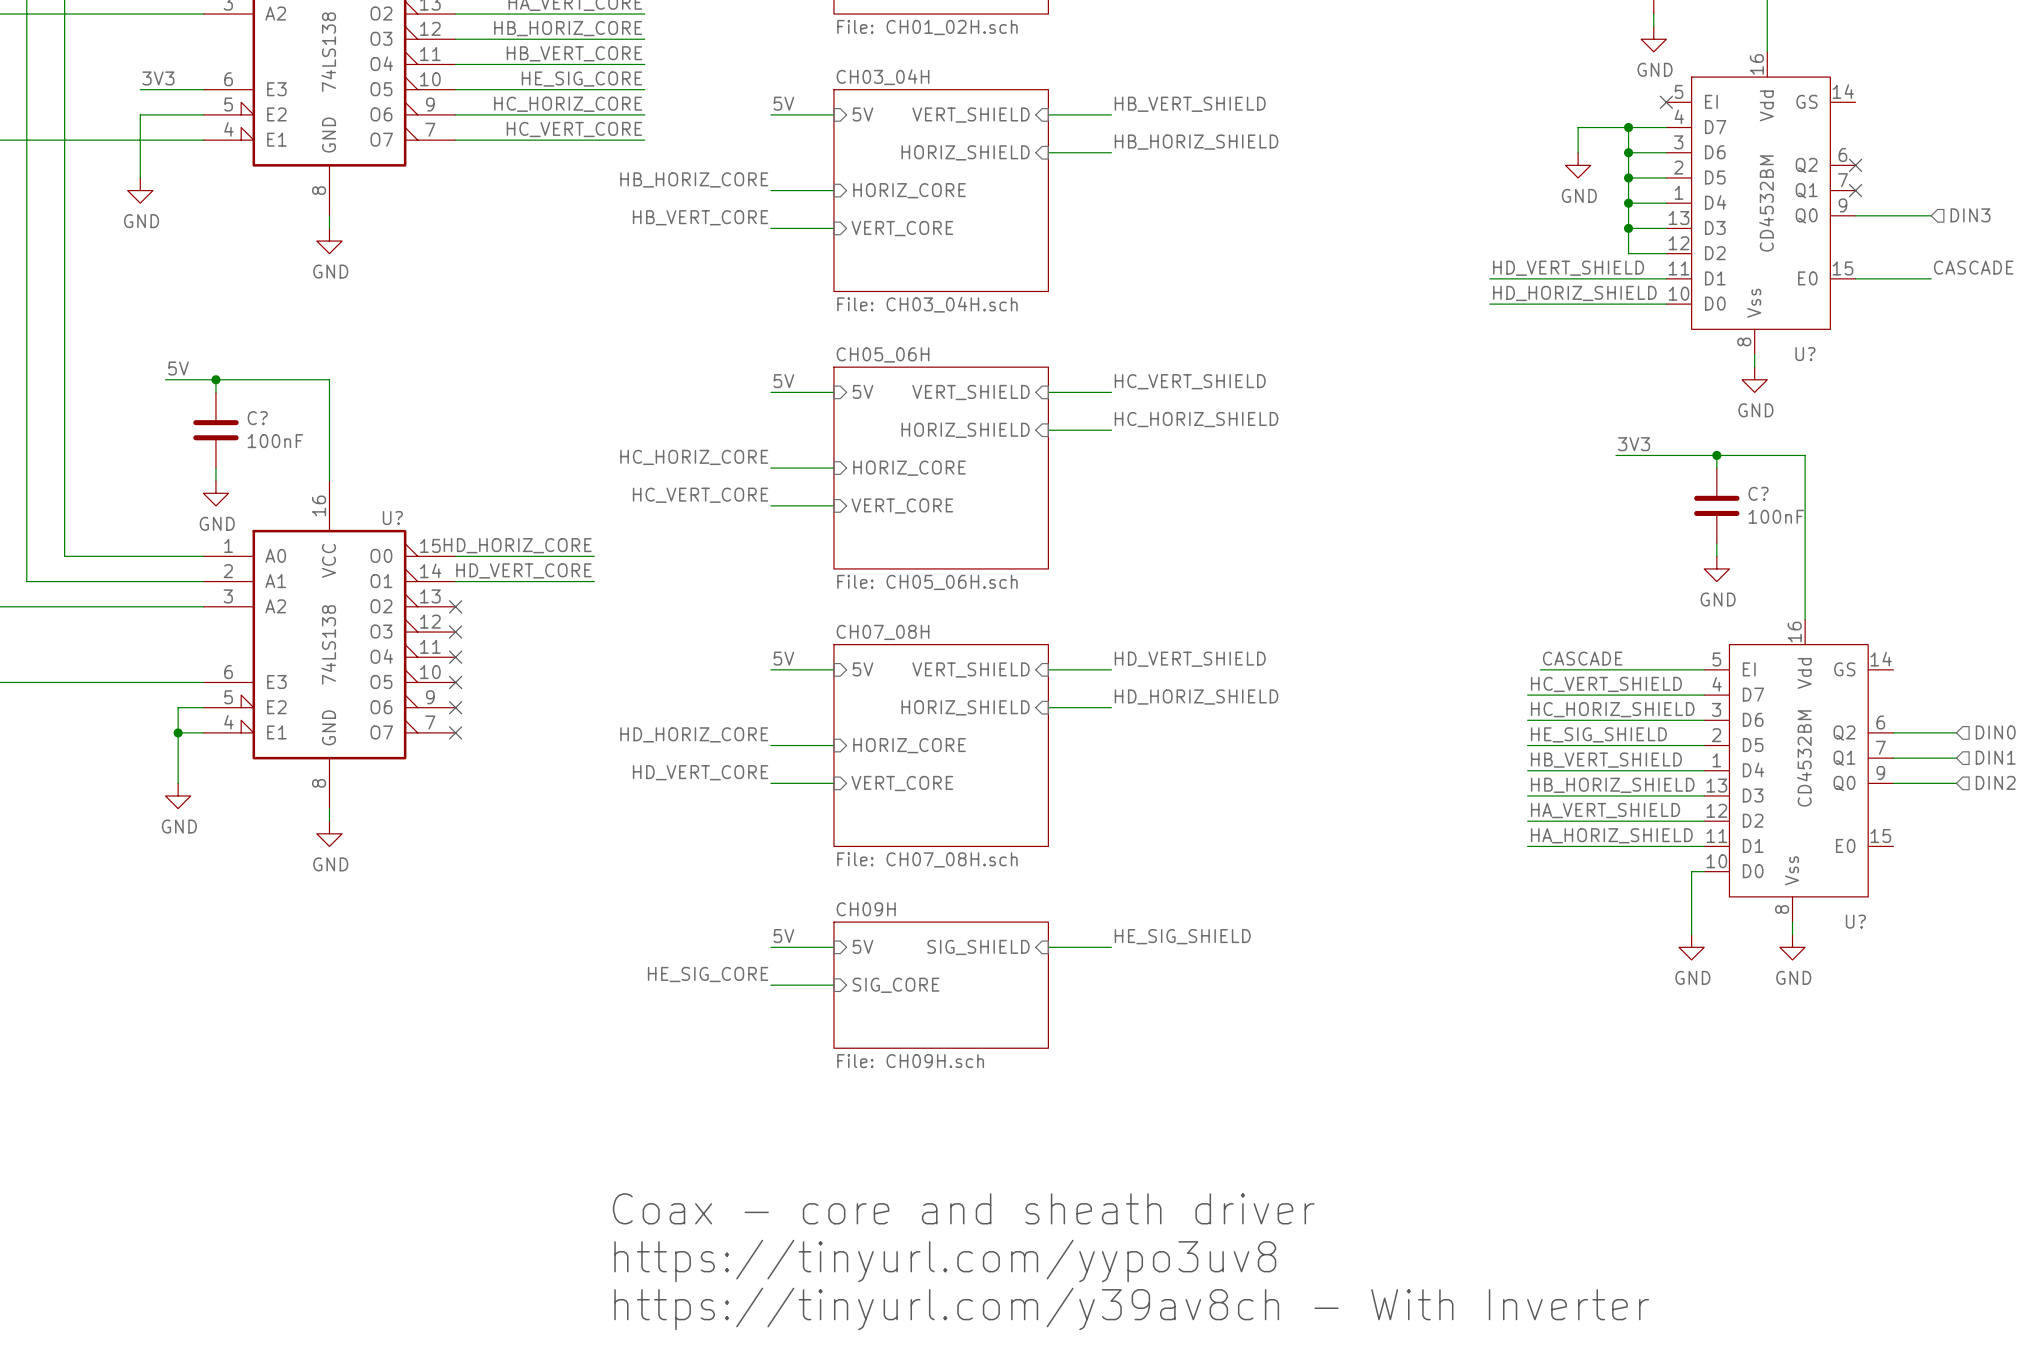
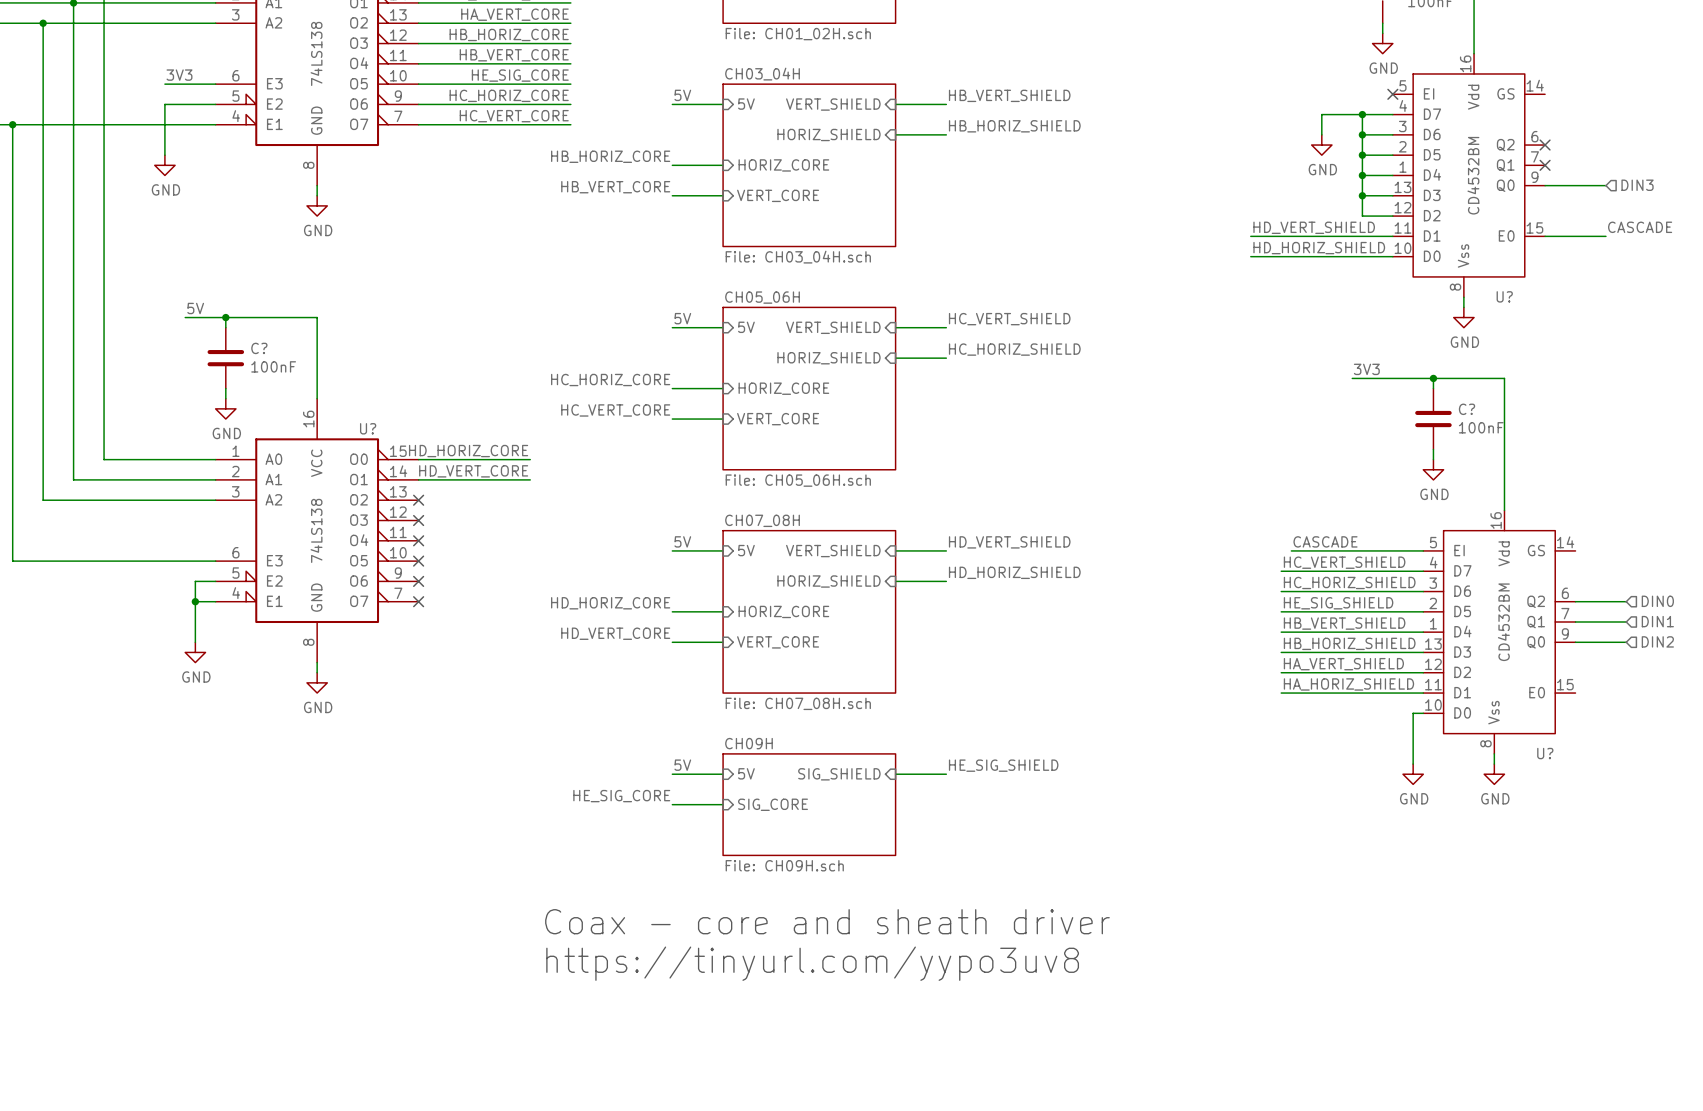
text position: Coax - core and sheath driver (963, 1208) -> Coax - core and sheath driver (827, 921)
text position: https://tinyurl.com/yypo3uv8 (945, 1261) -> https://tinyurl.com/yypo3uv8 (812, 963)
text: https://tinyurl.com/y39av8ch - With Inverter (1131, 1308) -> none

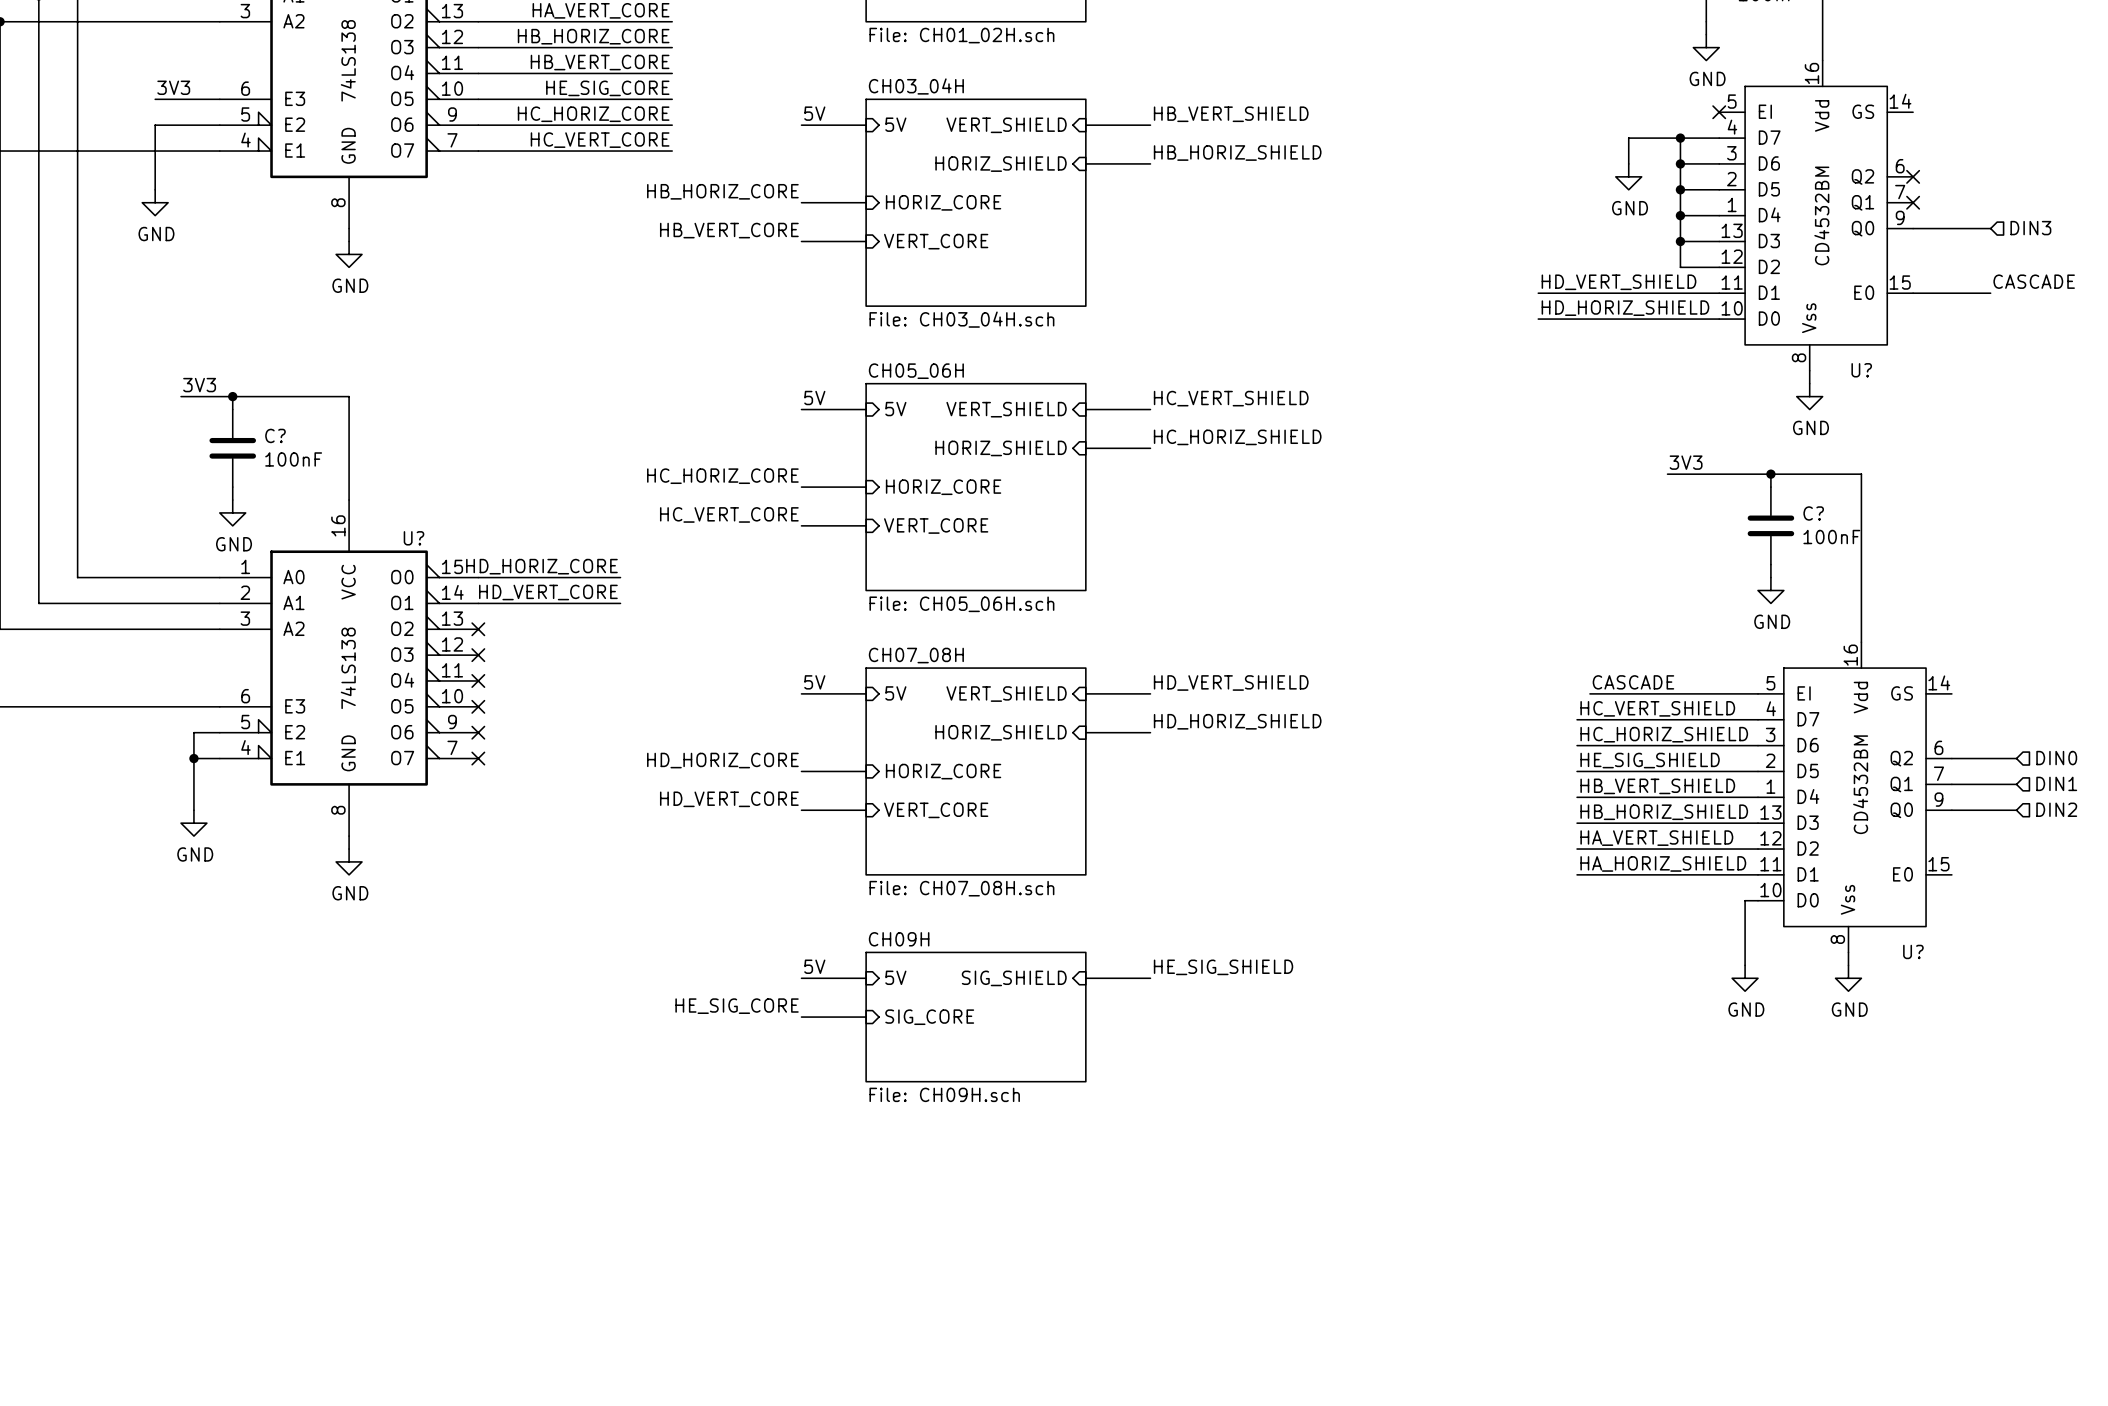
label: 5V (195, 308) -> 3V3 (199, 385)
text: Coax - core and sheath driver (827, 921) -> none
text: https://tinyurl.com/yypo3uv8 (812, 963) -> none

